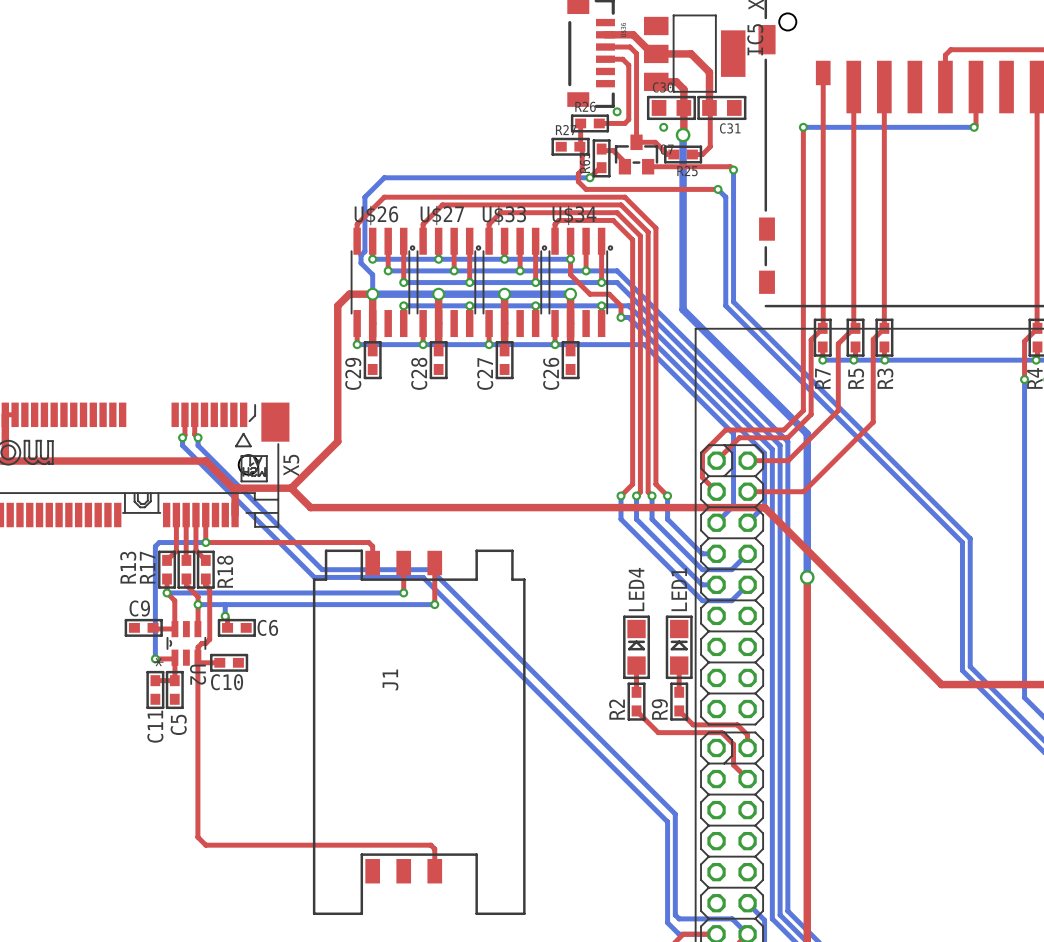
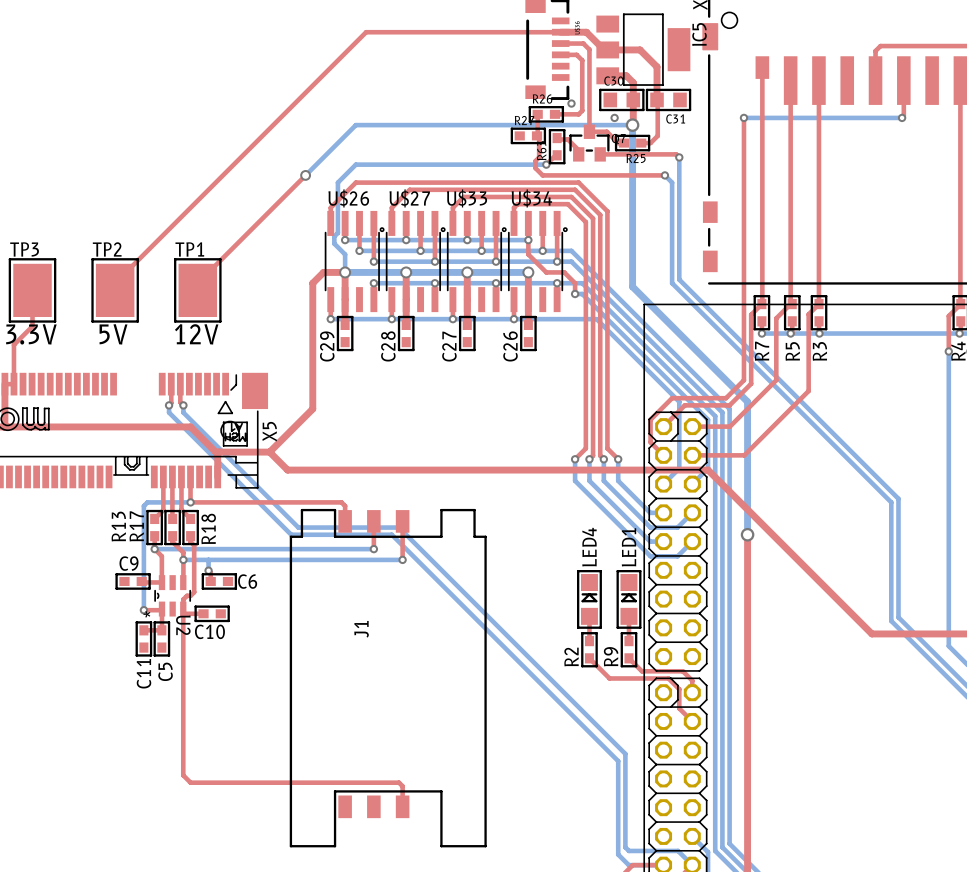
top track: none -> (560, 32) (366, 32) (122, 276) (115, 290) (118, 286) (118, 279)
bottom track: none -> (632, 125) (355, 125) (305, 175)
top track: none -> (305, 175) (208, 272) (197, 290) (197, 279)
via: none -> (305, 175)
top track: none -> (32, 290) (32, 326) (13, 344) (13, 384)
TP3: none -> (32, 290)
TP2: none -> (115, 290)
TP1: none -> (197, 290)
text: none -> 3.3V (31, 334)
text: none -> 12V (196, 334)
text: none -> 5V (113, 334)

